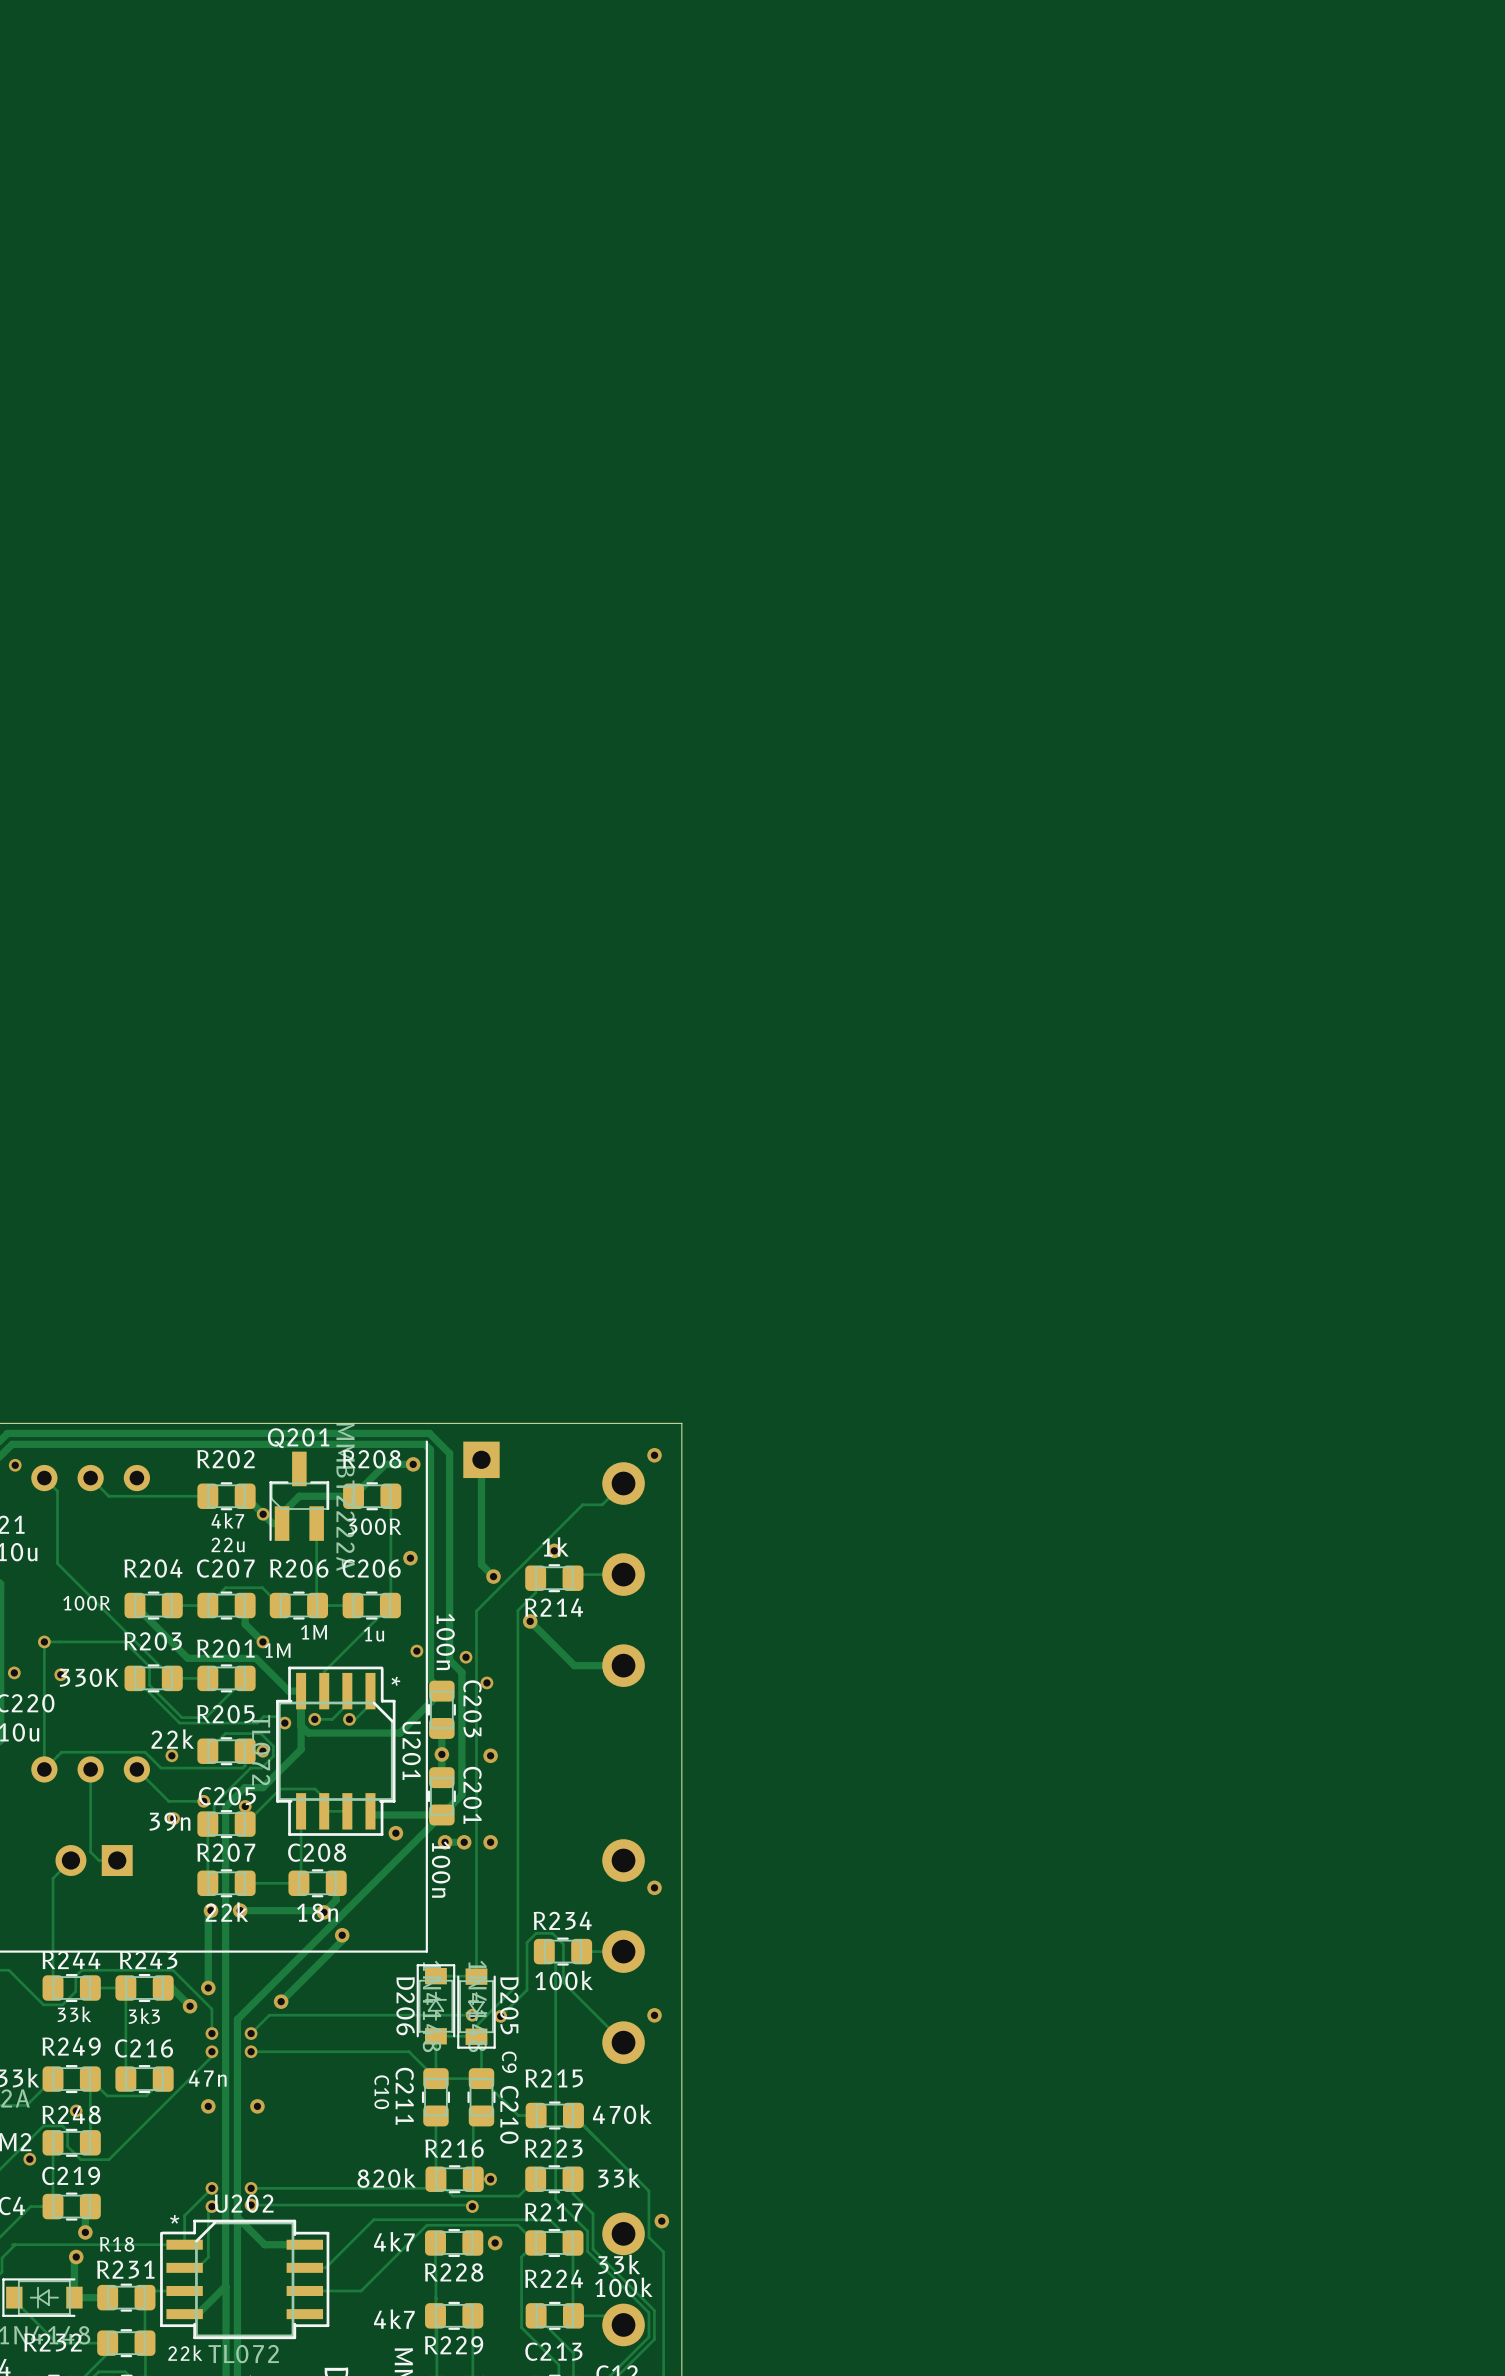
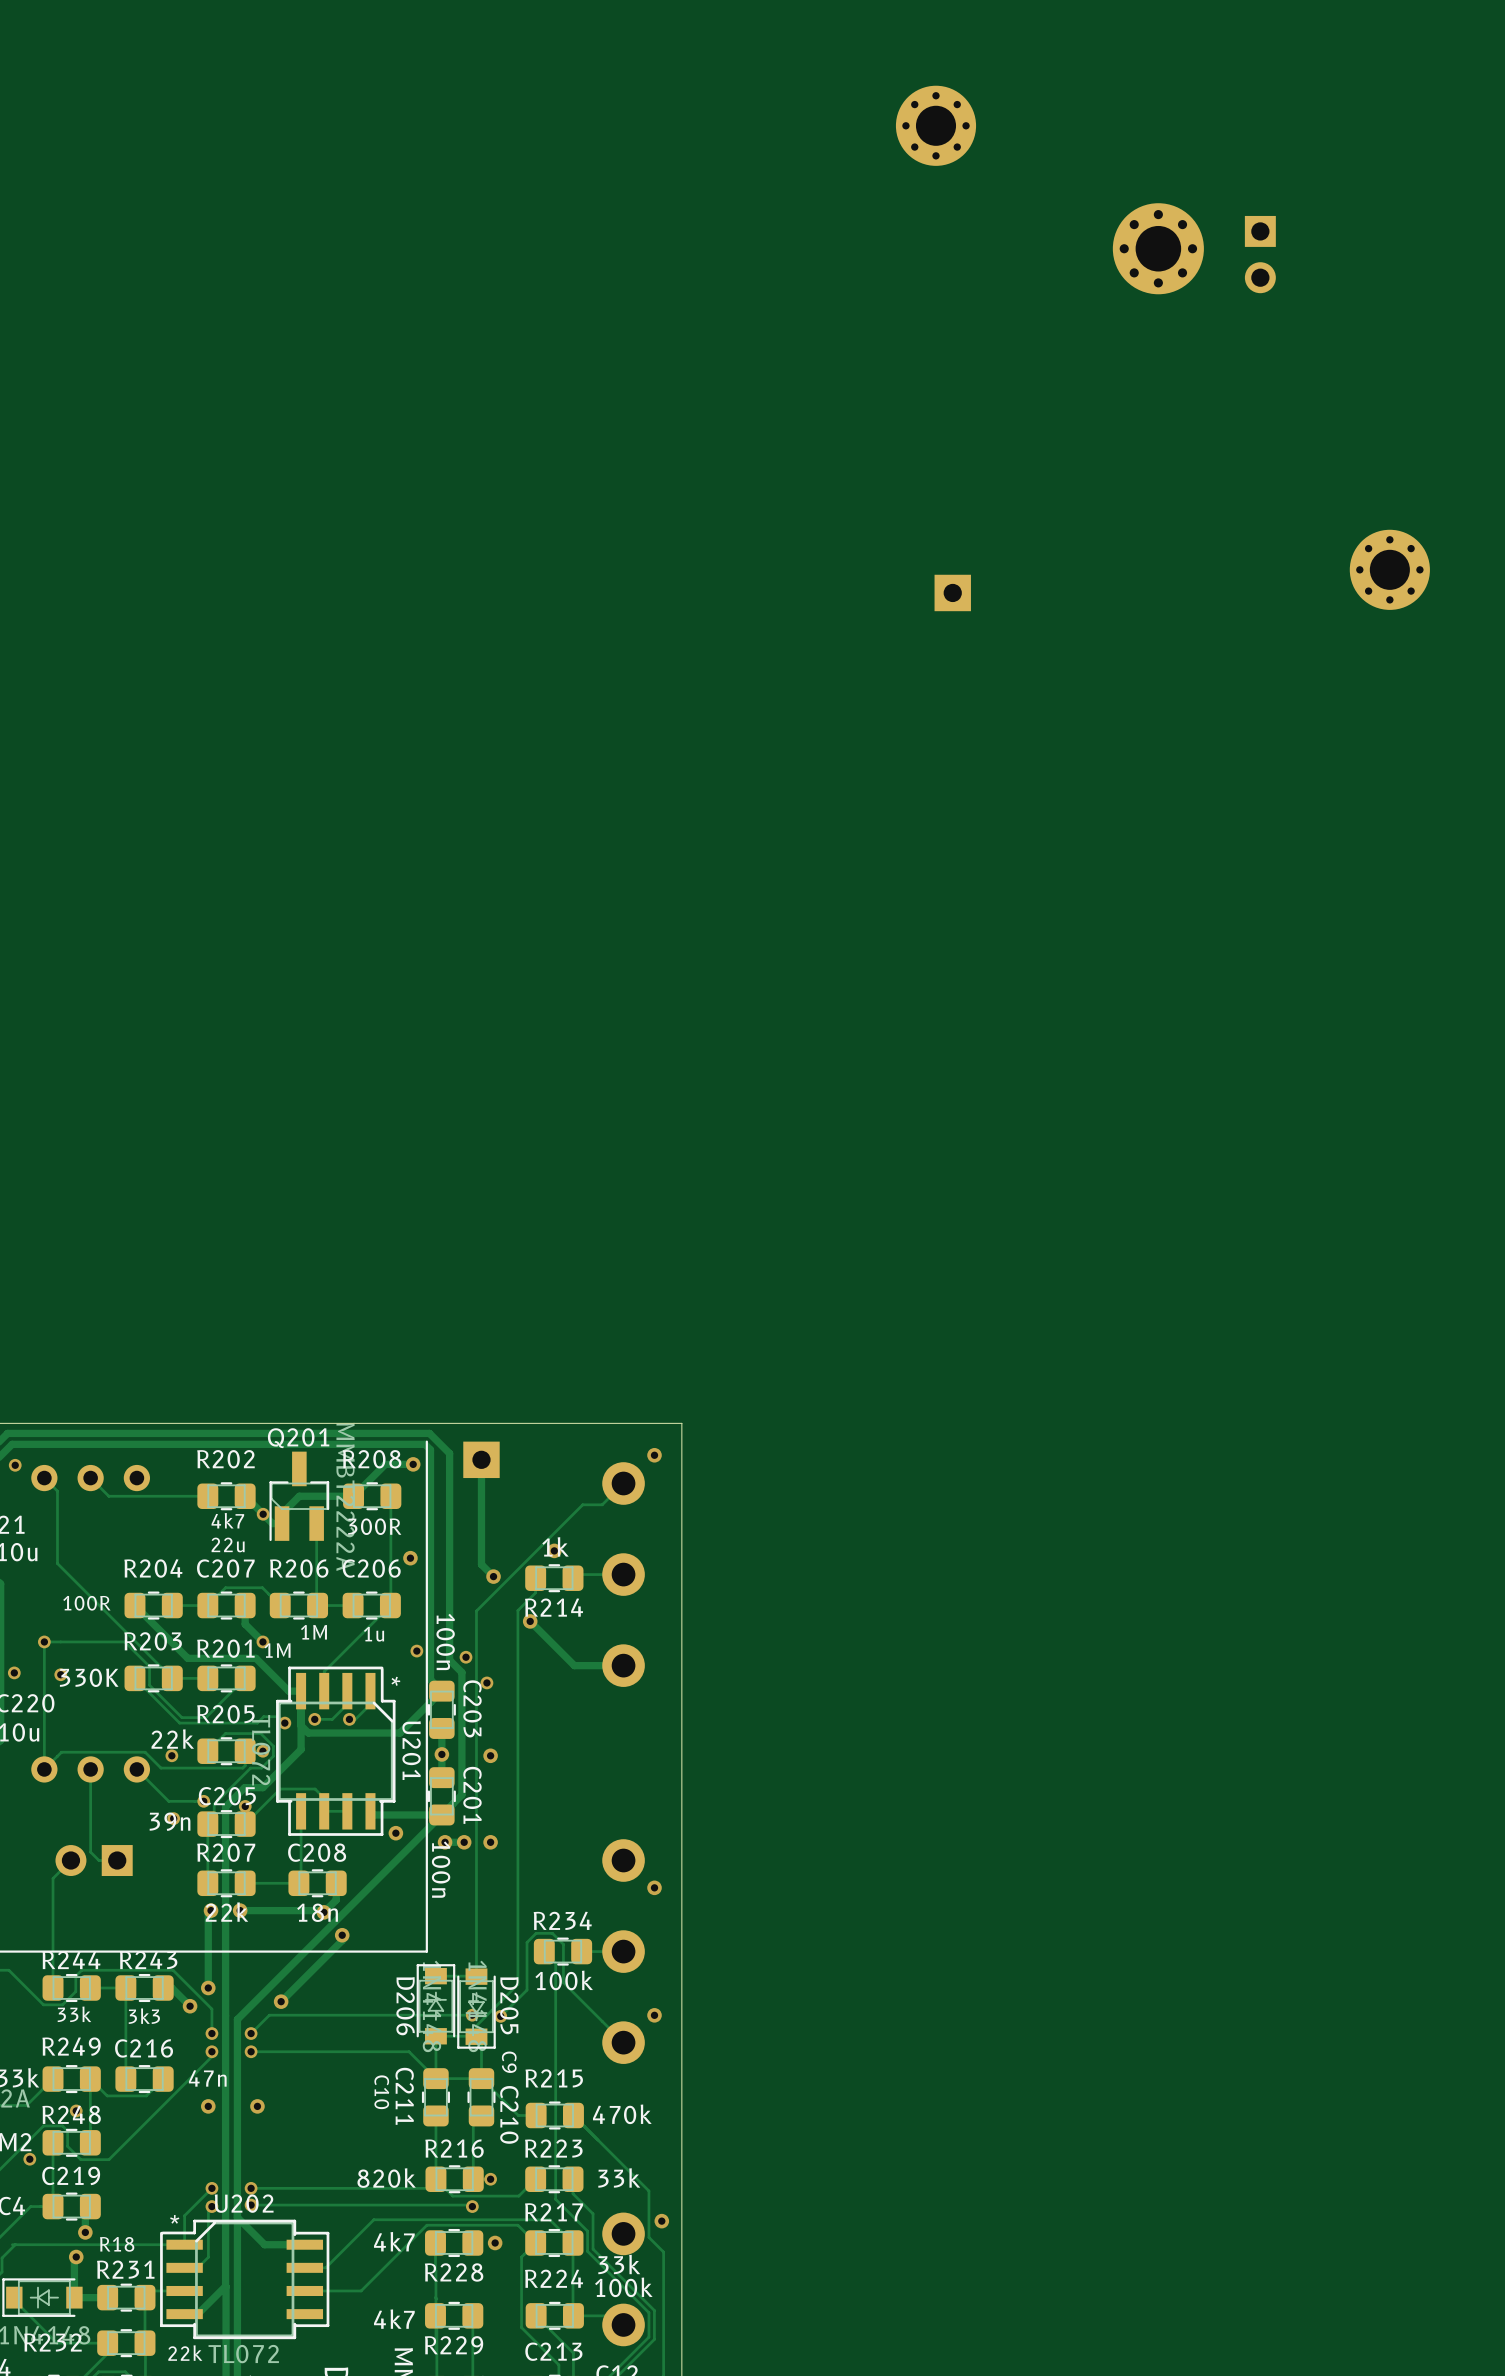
part: none -> (935, 125)
part: none -> (1158, 248)
part: none -> (1260, 254)
part: none -> (1389, 569)
part: none -> (952, 592)

